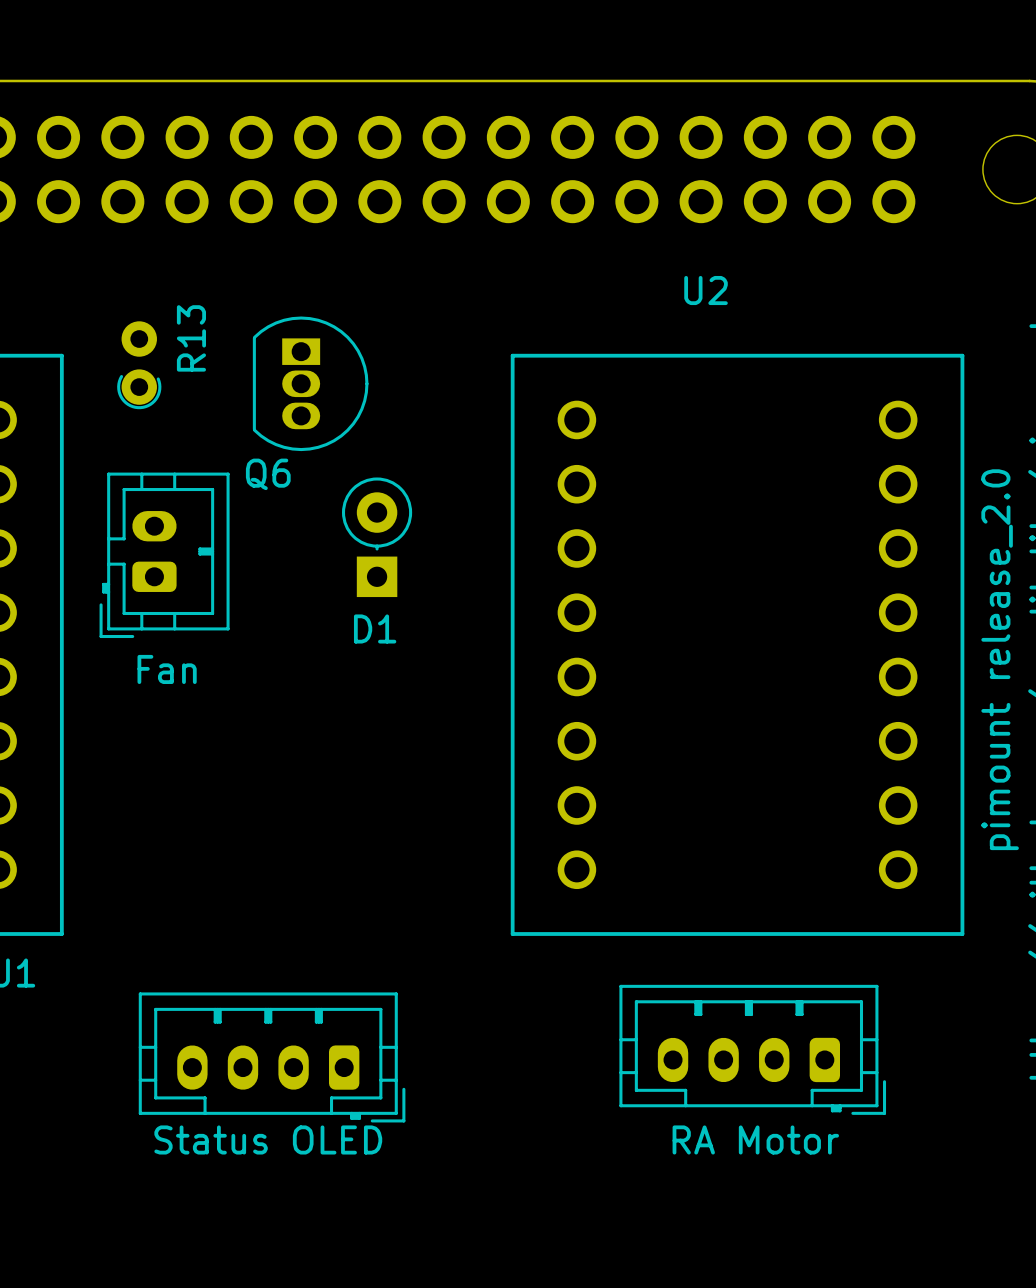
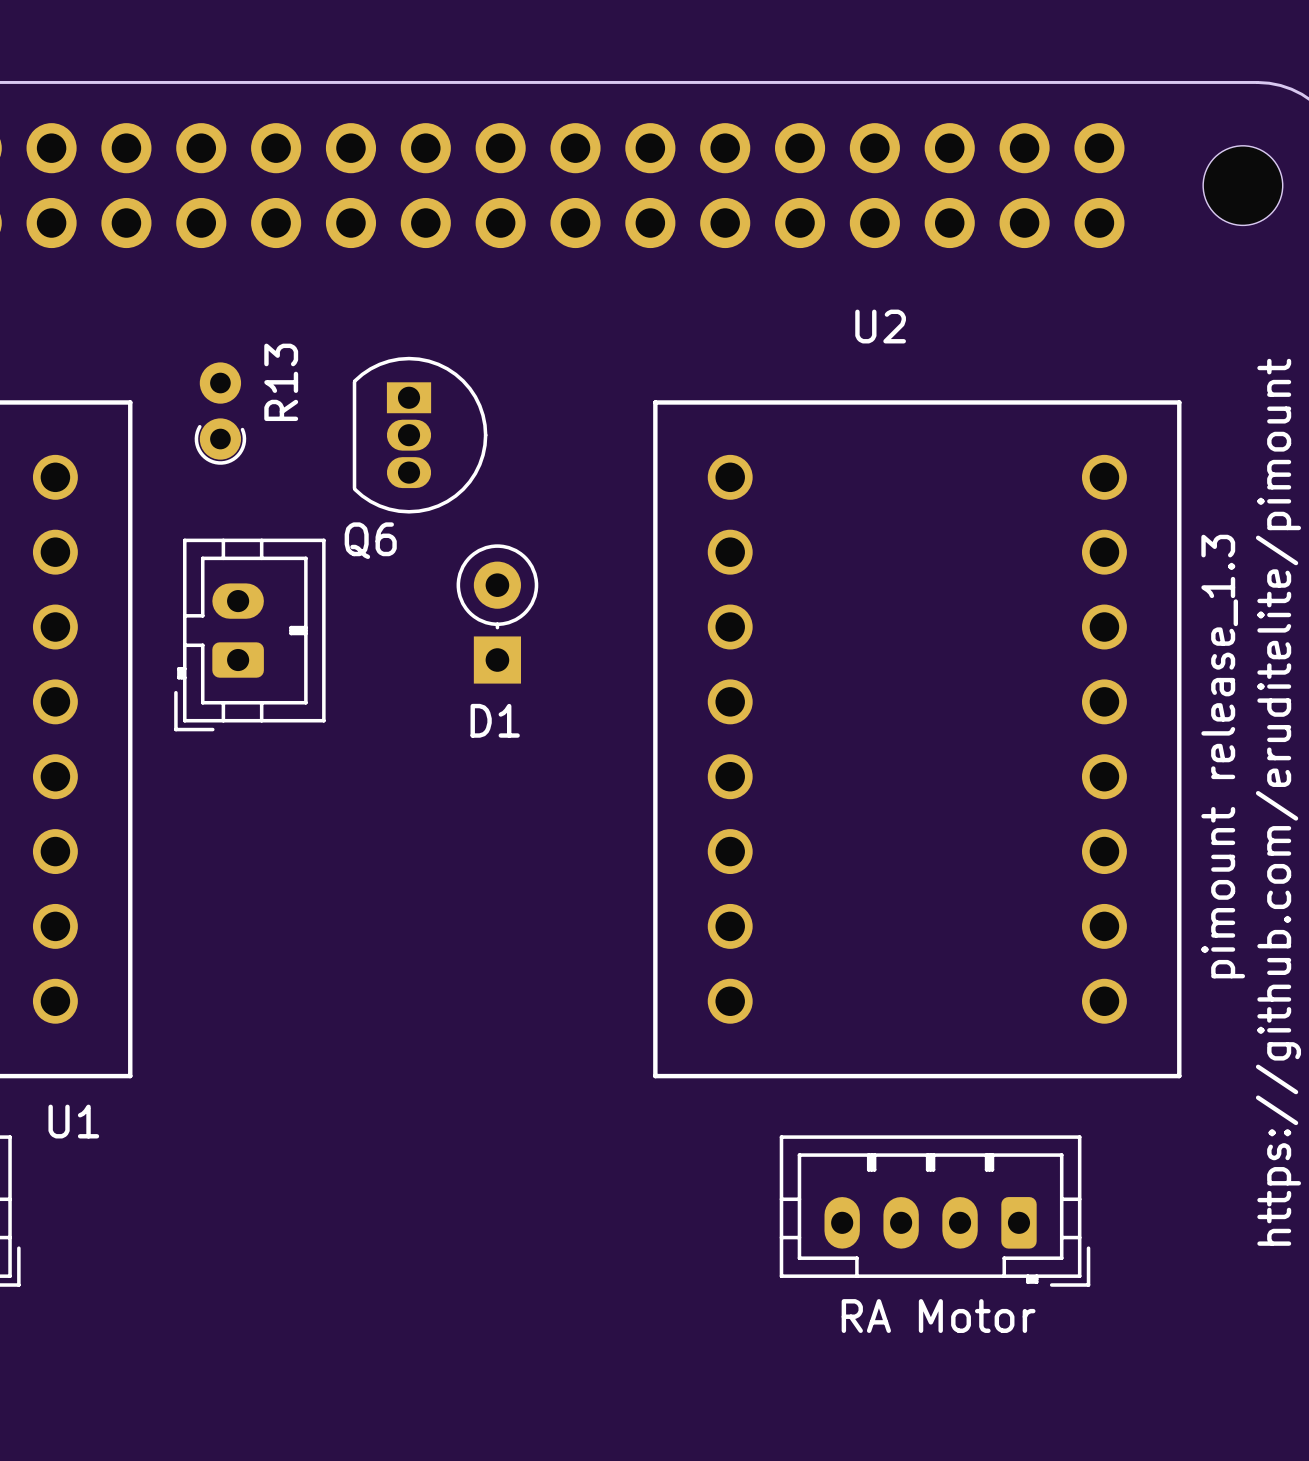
text: pimount release_2.0 (1000, 659) -> pimount release_1.3 (1223, 756)
text: Fan (167, 669) -> none
Status OLED: (272, 1057) -> none

